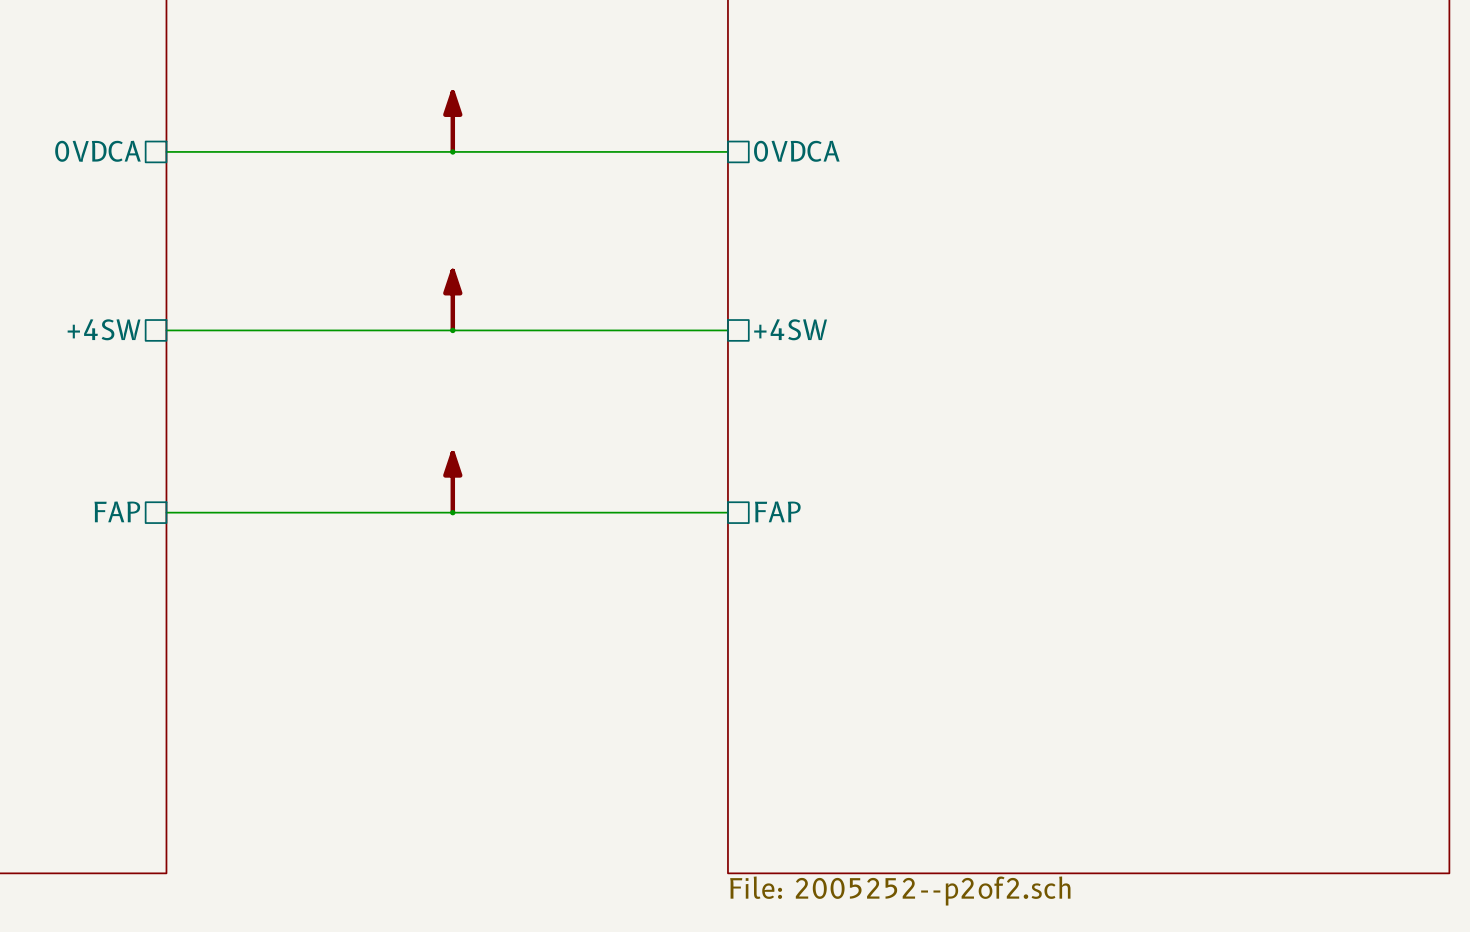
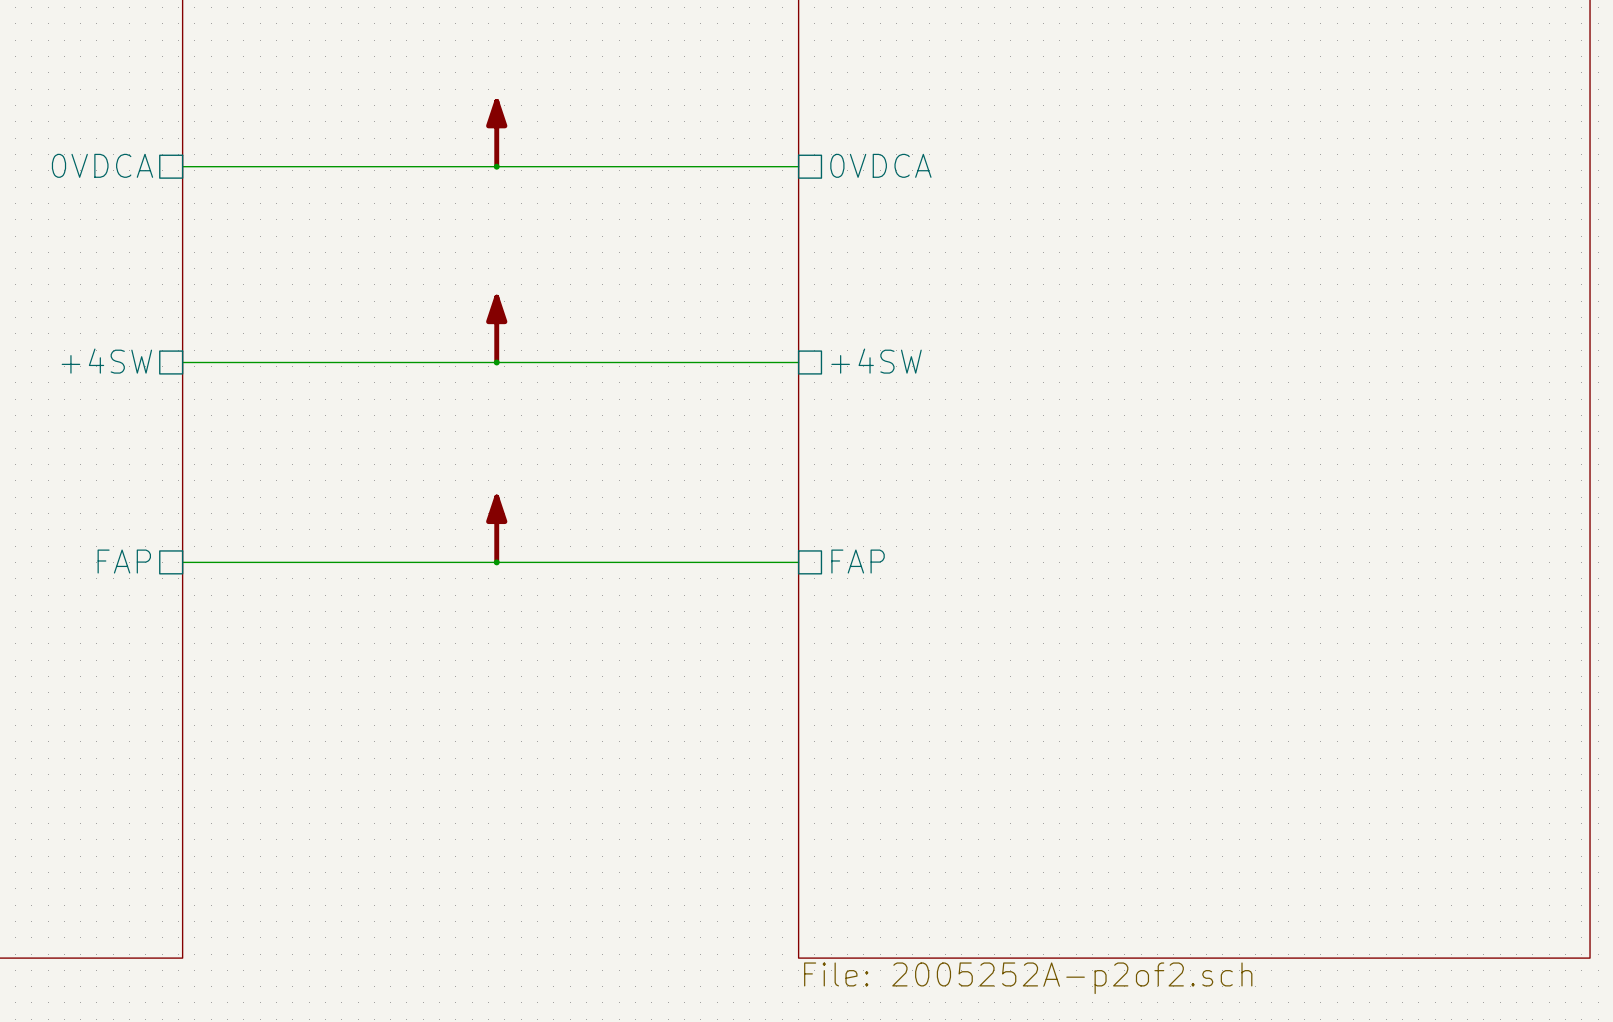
sheet value: File: 2005252--p2of2.sch (900, 891) -> File: 2005252A-p2of2.sch (1028, 978)

